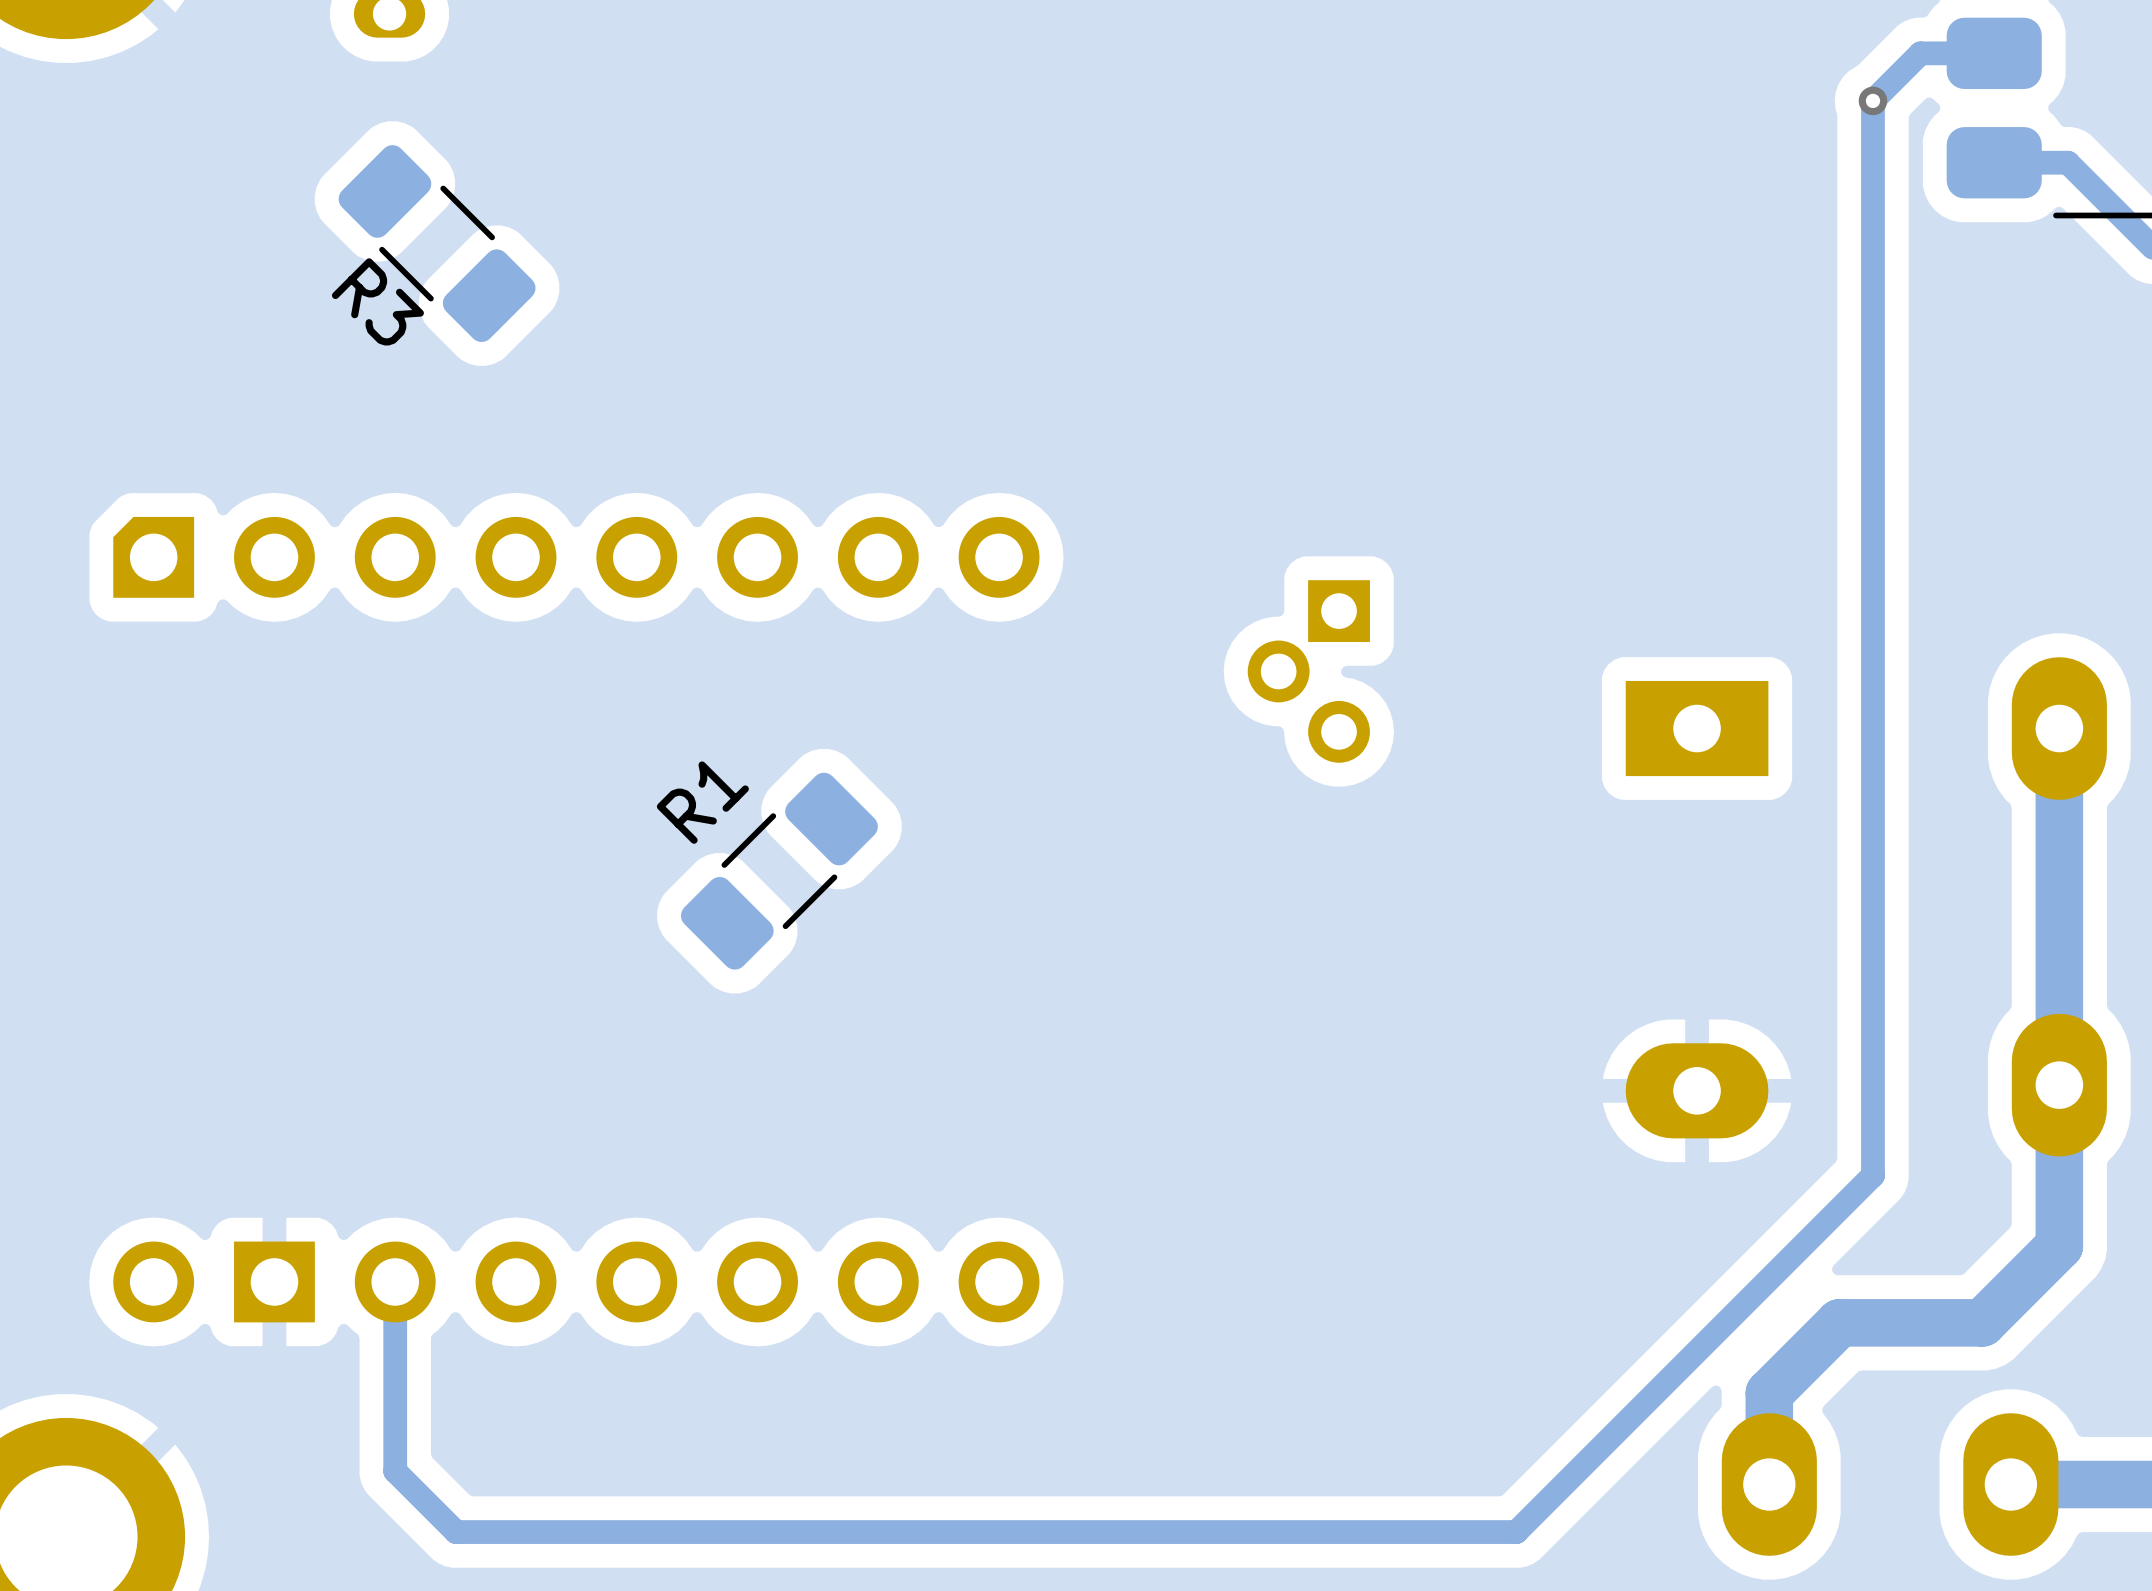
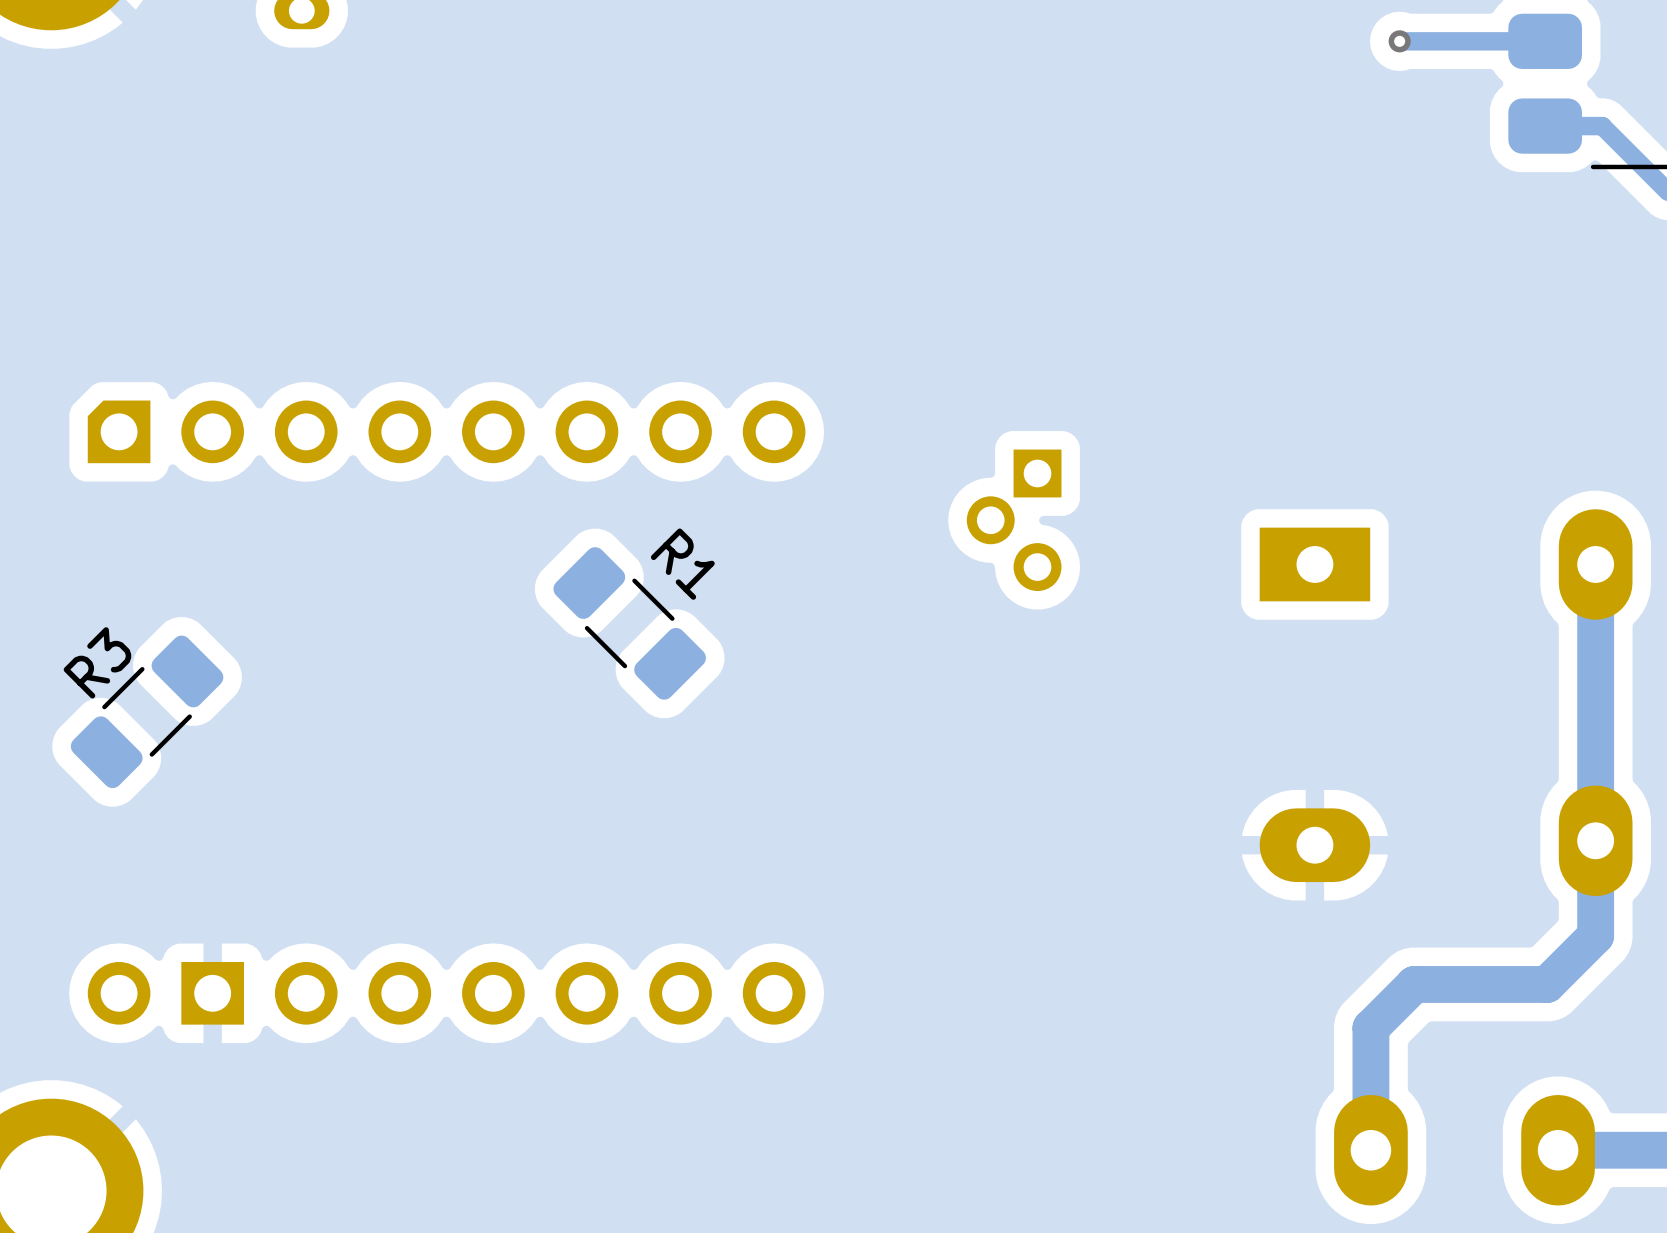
track: (1920, 53) (1872, 100) (1872, 1175) (1516, 1532) (456, 1532) (395, 1471) (395, 1281) -> (1488, 41) (1399, 41)
via position: (1872, 100) -> (1399, 41)
R3 rotation: 0° (437, 243) -> 90° clockwise (147, 711)
R3 position: (437, 243) -> (147, 711)
R1 rotation: 0° (779, 871) -> 90° clockwise (629, 623)
track: (2059, 1207) (2059, 1245) (1982, 1322) (1839, 1322) (1769, 1393) -> (1595, 935) (1547, 984) (1414, 984) (1370, 1027) (1370, 1079)

